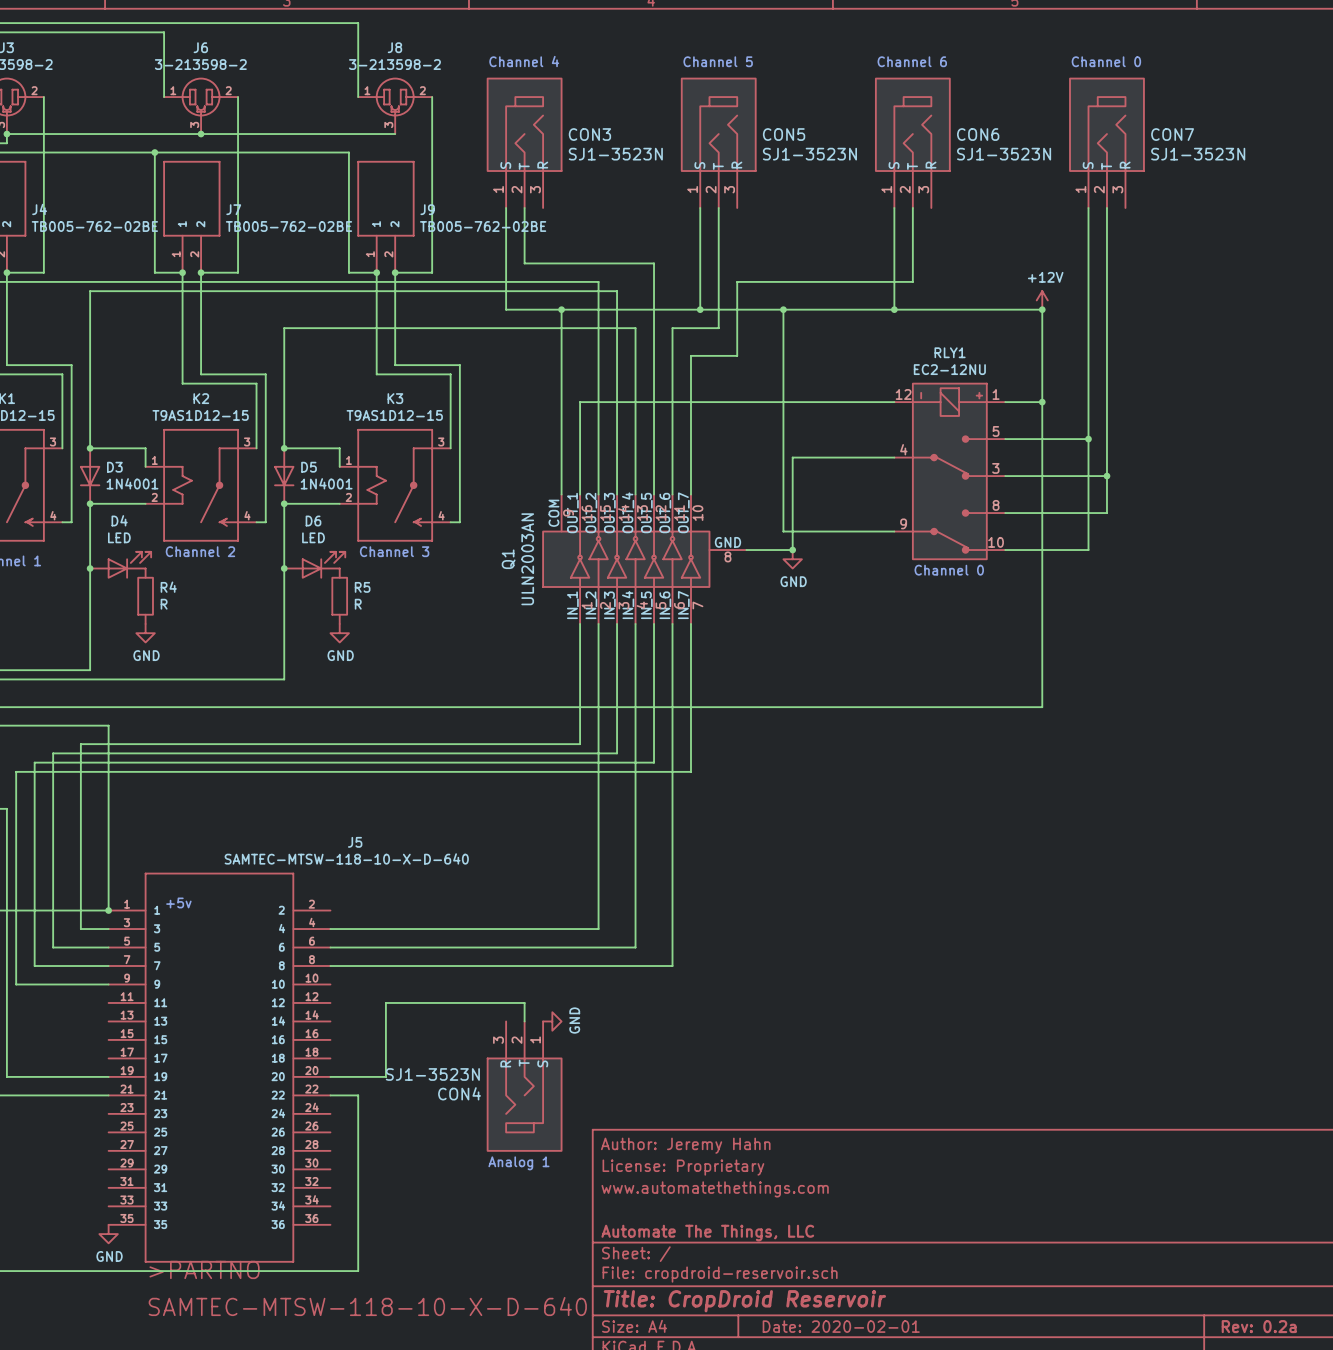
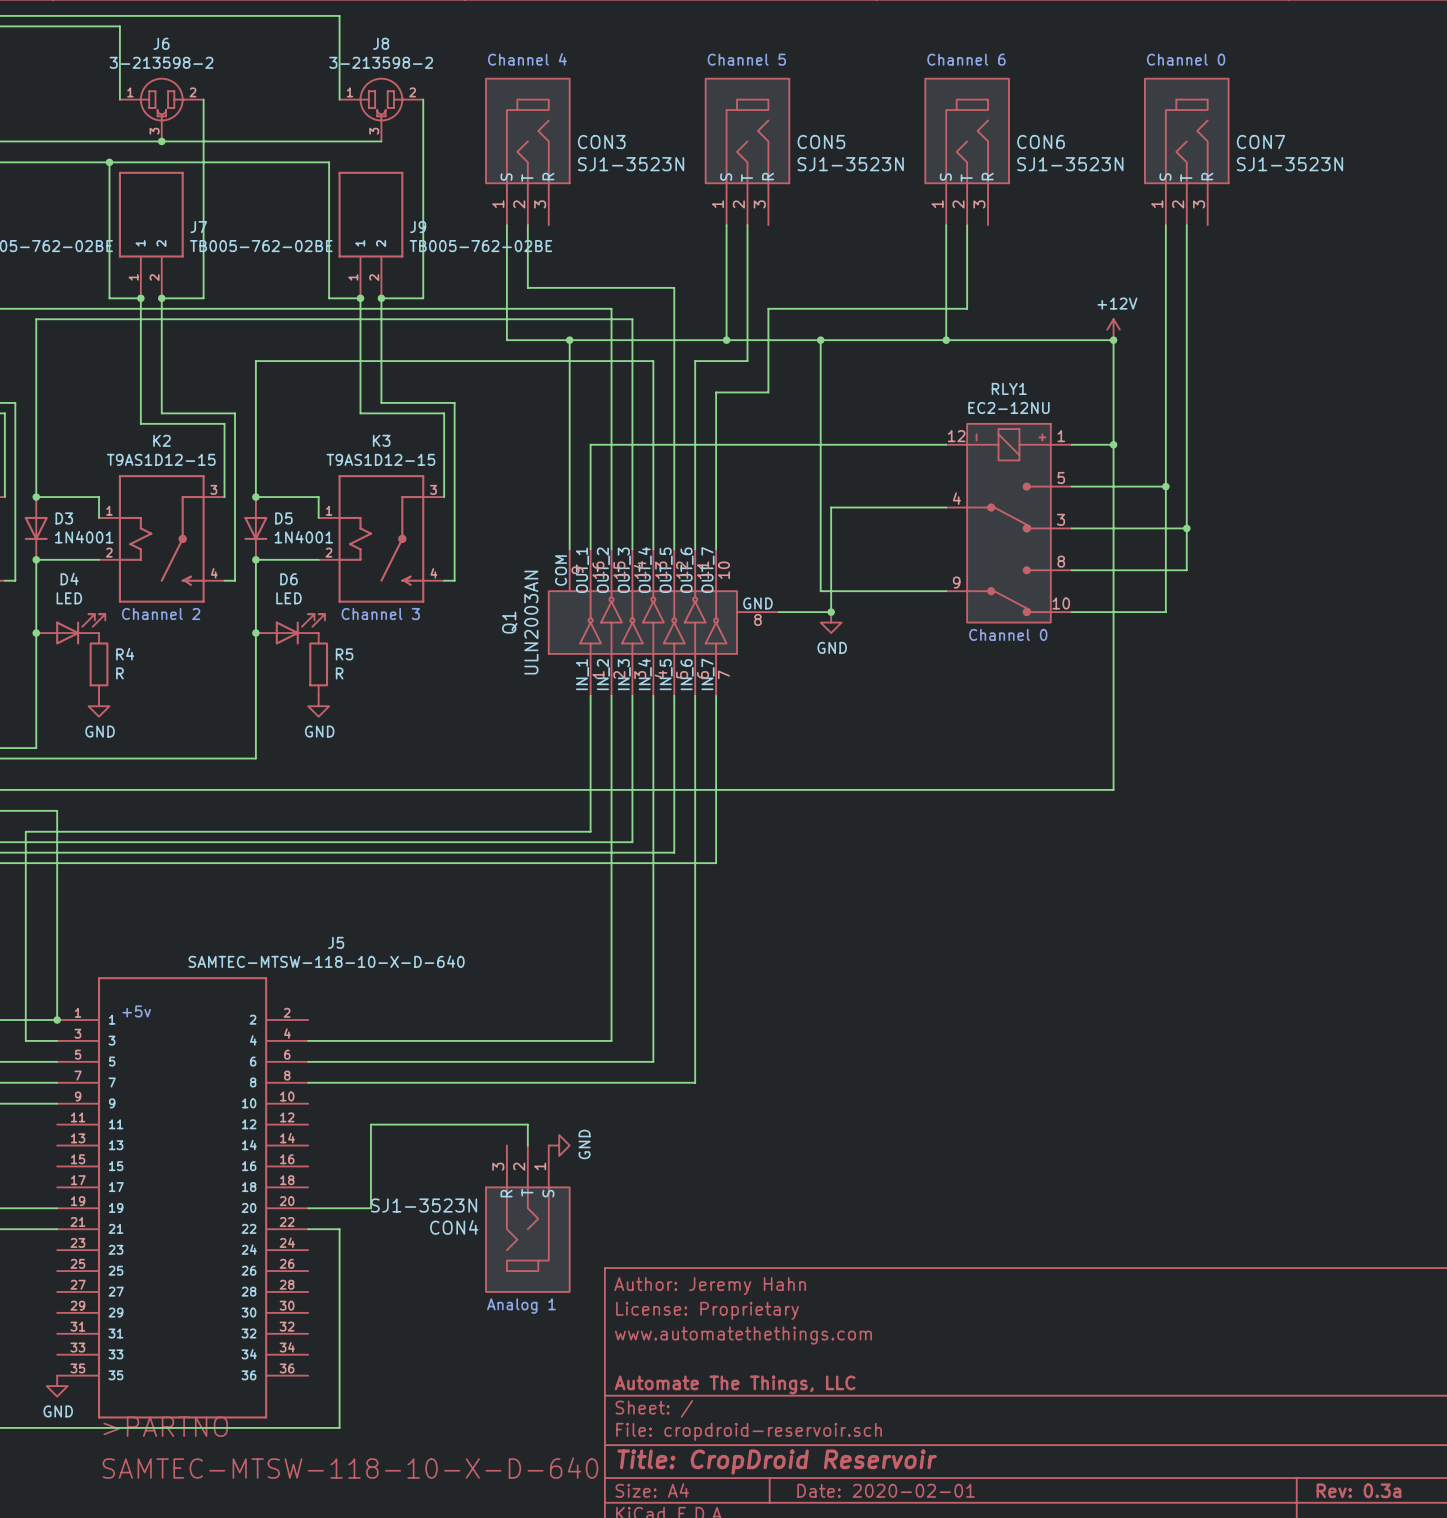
title block: Rev: 0.2a (1259, 1326) -> Rev: 0.3a (1358, 1490)

